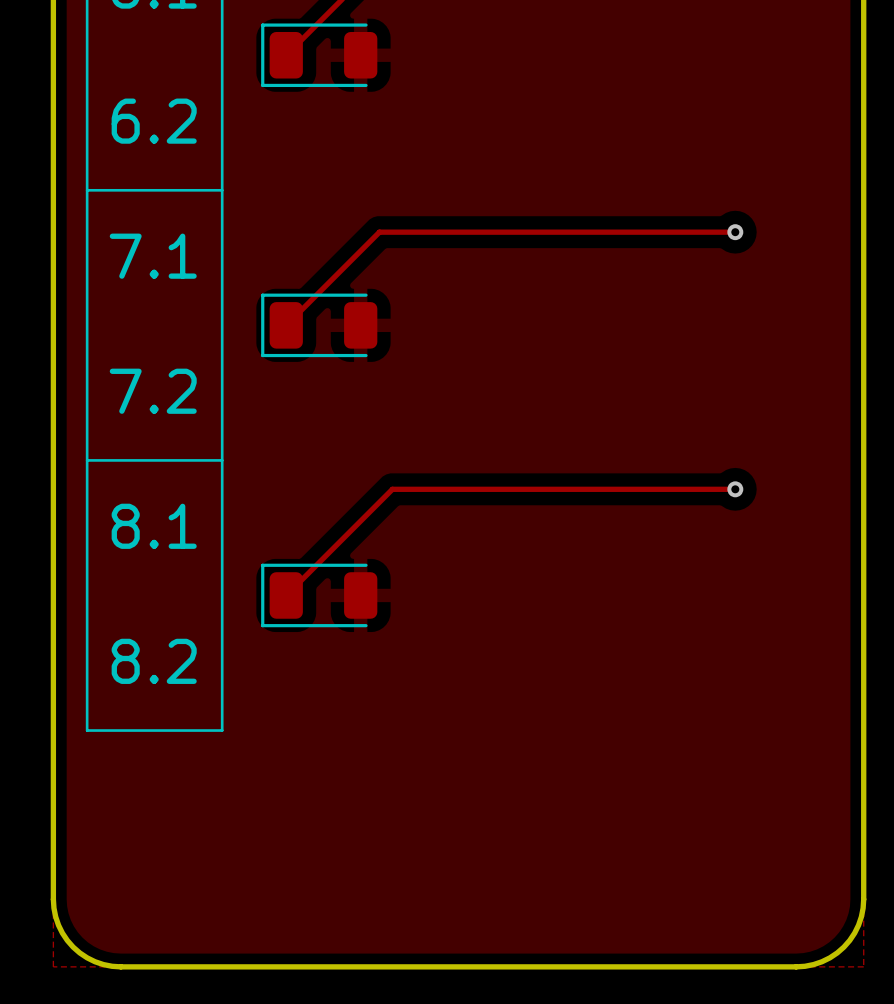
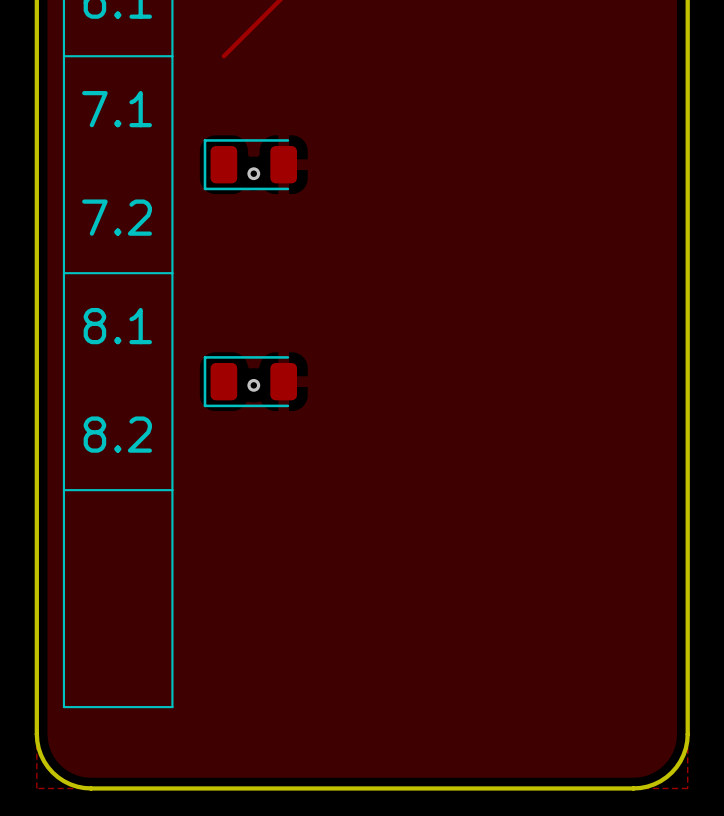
part: (319, 55) -> none
text: 6.2 (154, 121) -> 7.1 (117, 109)
line: (87, 190) (222, 190) -> (63, 56) (172, 56)
part: none -> (250, 164)
via: none -> (253, 173)
track: (735, 232) (379, 232) (286, 325) -> none
via: (735, 232) -> none
text: 7.1 (153, 256) -> 7.2 (117, 217)
part: (319, 325) -> none
text: 7.2 (153, 391) -> 8.1 (117, 326)
line: (87, 460) (222, 460) -> (63, 273) (172, 273)
part: none -> (250, 381)
via: none -> (253, 385)
track: (735, 489) (392, 489) (286, 595) -> none
via: (735, 489) -> none
text: 8.1 (154, 526) -> 8.2 (117, 434)
line: none -> (63, 490) (172, 490)
part: (319, 595) -> none
text: 8.2 (154, 661) -> none
line: (87, 730) (222, 730) -> (63, 598) (63, 707) (172, 707) (172, 598)

